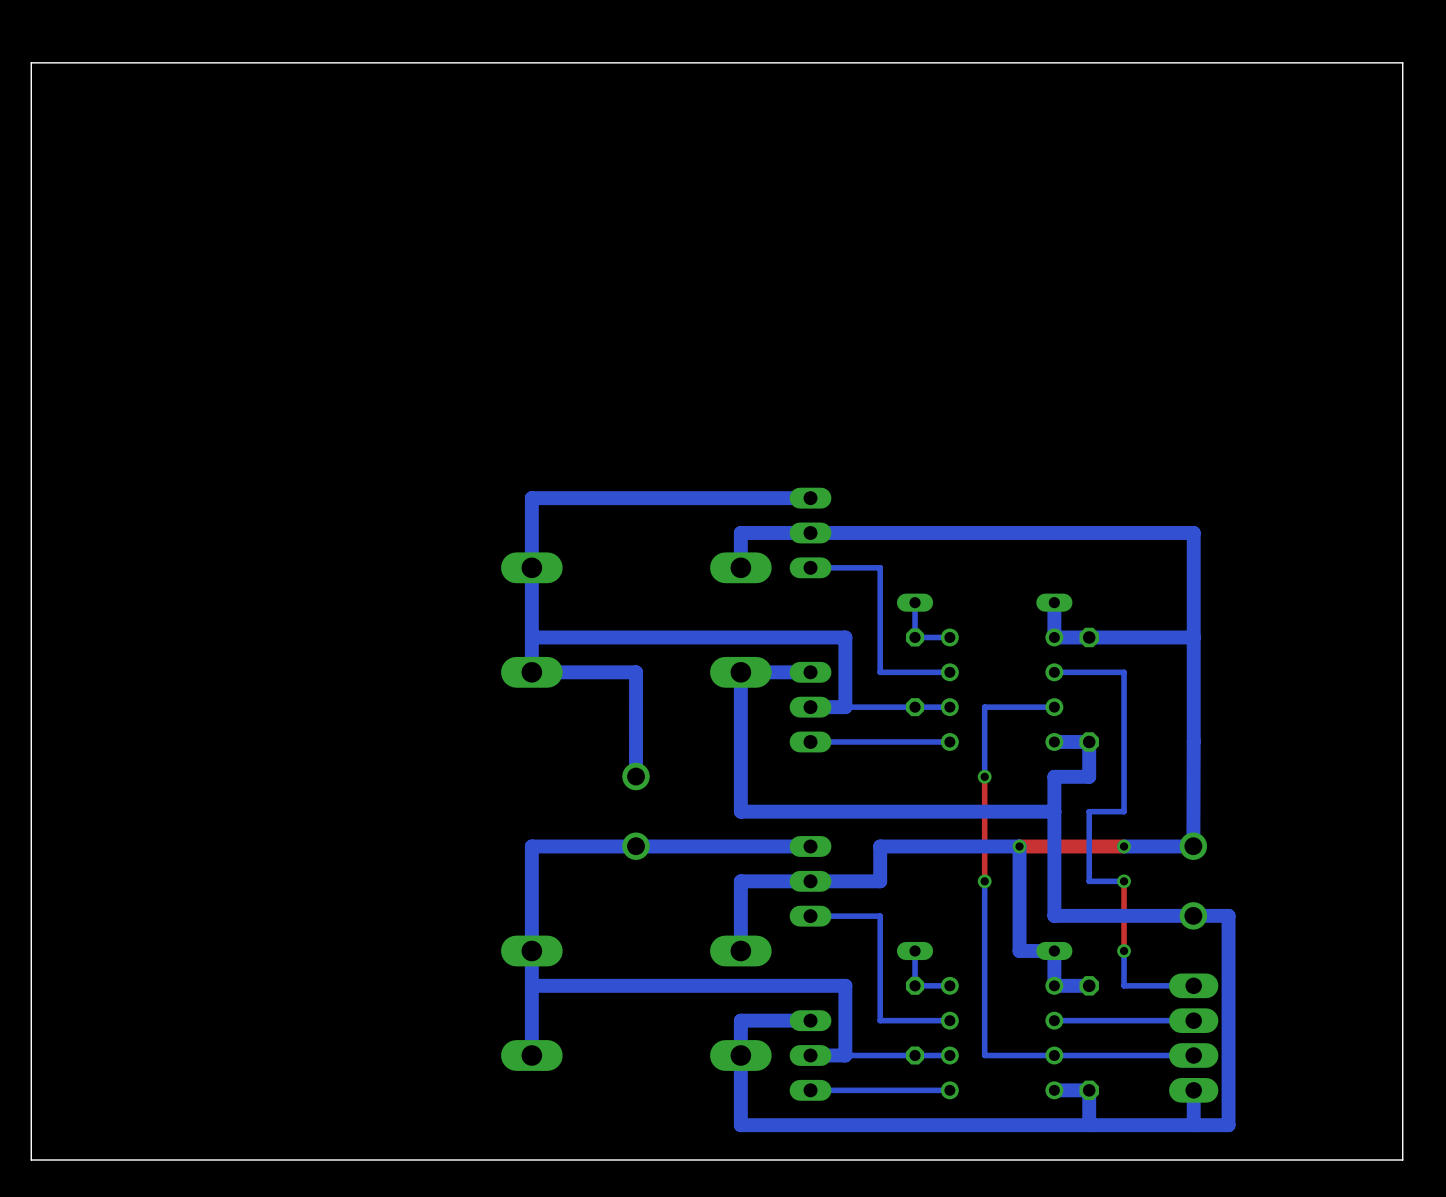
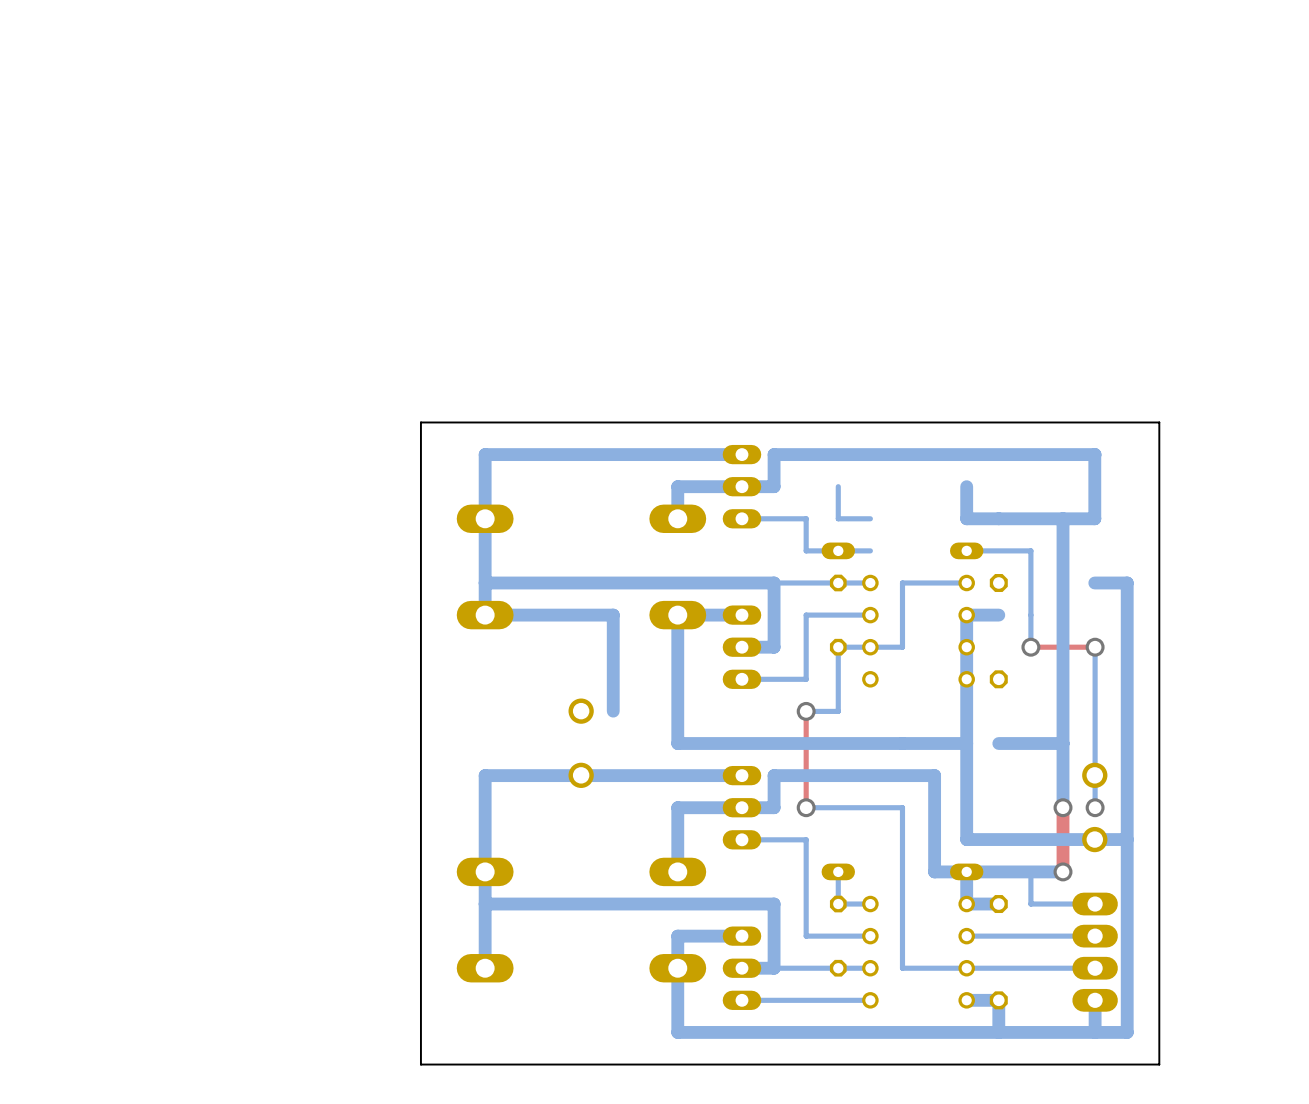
bottom track: none -> (1094, 454) (1094, 518) (966, 518) (966, 486)
bottom track: (845, 532) (1193, 532) (1193, 707) -> (774, 486) (774, 454) (1095, 454)
bottom track: none -> (838, 486) (838, 518) (870, 518)
bottom track: none -> (1063, 518) (1063, 807)
bottom track: (880, 602) (880, 672) -> (806, 550) (870, 550)
bottom track: (915, 602) (915, 637) -> (774, 582) (838, 582)
bottom track: (1054, 602) (1054, 637) (1193, 637) -> (966, 550) (1030, 550) (1030, 615)
bottom track: none -> (966, 582) (902, 582) (902, 647) (870, 647)
bottom track: none -> (1095, 582) (1127, 582) (1127, 839)
bottom track: (636, 672) (636, 776) -> (581, 615) (613, 615) (613, 711)
bottom track width: thin (1089, 672) (1054, 672) -> thick (998, 615) (966, 615)
bottom track: (1124, 672) (1089, 672) -> none
bottom track: (915, 707) (845, 707) -> (838, 647) (838, 711) (806, 711)
bottom track: (1054, 707) (984, 707) (984, 776) -> none
bottom track: (1124, 707) (1124, 811) -> (1063, 743) (1030, 743)
via: none -> (1030, 647)
bottom track width: thick (1193, 707) (1193, 741) -> thin (1095, 647) (1095, 679)
top track: none -> (1095, 647) (1030, 647)
via: none -> (1095, 647)
bottom track: (949, 741) (880, 741) -> (806, 615) (806, 679)
bottom track: (1054, 741) (1089, 741) (1089, 776) (1054, 776) -> (966, 615) (966, 711)
bottom track: (1193, 741) (1193, 846) (1124, 846) -> (1095, 679) (1095, 807)
via: none -> (806, 711)
top track: (984, 776) (984, 881) -> (806, 711) (806, 807)
via: (984, 776) -> none
bottom track: (1089, 811) (1089, 881) (1124, 881) -> none
bottom track width: thin (1124, 811) (1089, 811) -> thick (1030, 743) (998, 743)
bottom track: (880, 846) (880, 881) (845, 881) -> (806, 775) (774, 775) (774, 807)
via: (1019, 846) -> none
top track: (1124, 846) (1019, 846) -> none
via: (1124, 846) -> none
via: none -> (806, 807)
bottom track: none -> (902, 807) (806, 807)
via: (984, 881) -> none
top track: (1124, 881) (1124, 950) -> (1063, 807) (1063, 871)
via: (1124, 881) -> none
via: none -> (1063, 807)
via: none -> (1095, 807)
via: (1124, 950) -> none
bottom track: none -> (1063, 871) (966, 871)
via: none -> (1063, 871)
board edge: (1263, 1160) (1402, 1160) (1402, 62) (31, 62) (31, 1160) (462, 1160) -> (1159, 1064) (1159, 422) (420, 422) (420, 1064)

